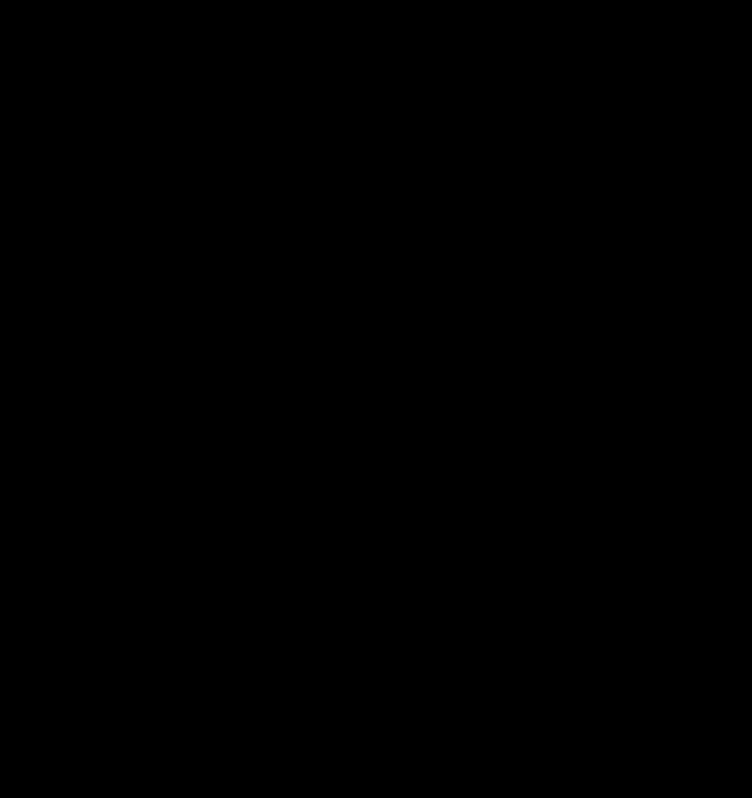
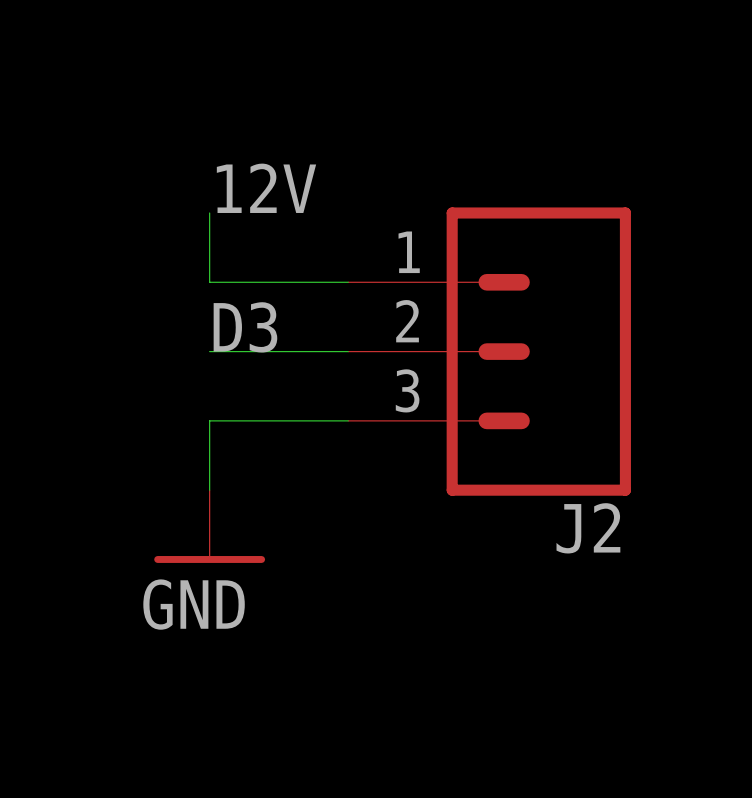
label: none -> 12V (266, 188)
wire: none -> (209, 212) (209, 282) (348, 282)
label: none -> D3 (245, 327)
wire: none -> (209, 351) (348, 351)
J2: none -> (489, 351)
wire: none -> (348, 420) (209, 420) (209, 490)
power symbol: none -> GND (209, 526)

